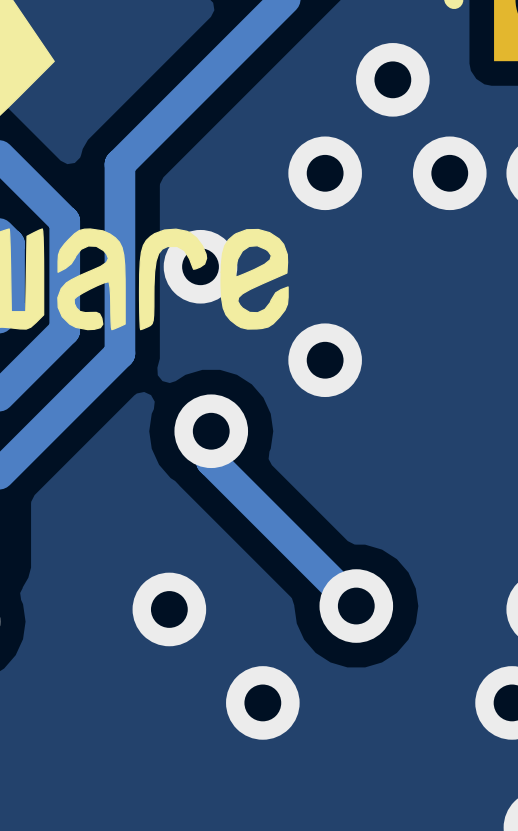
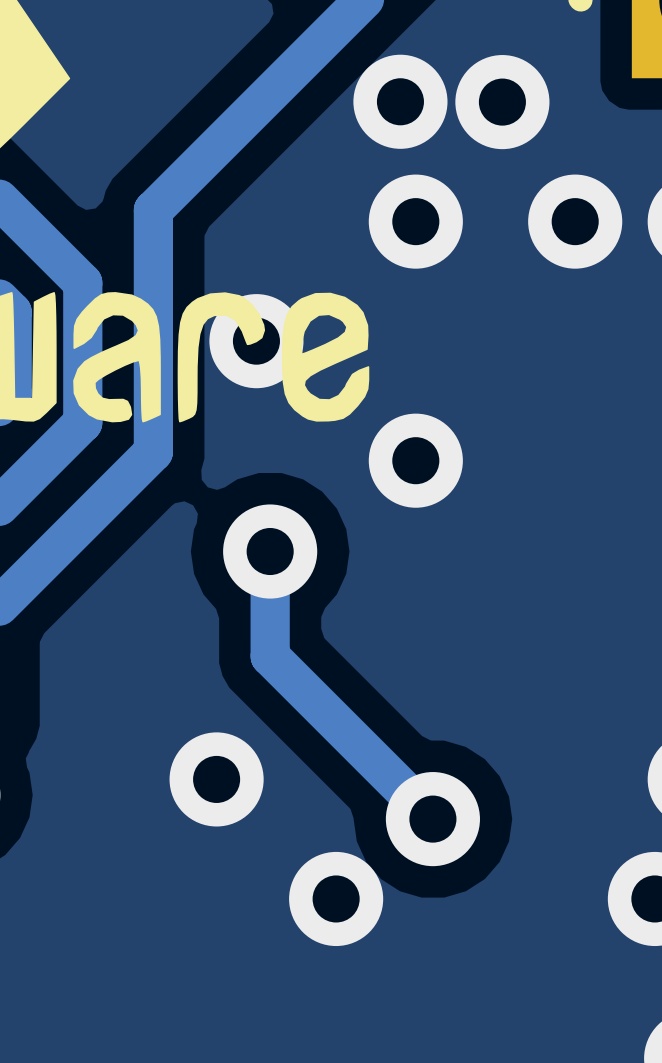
via: none -> (400, 101)
track: (211, 460) (356, 606) -> (270, 589) (270, 656) (432, 819)
via position: (356, 606) -> (432, 819)

